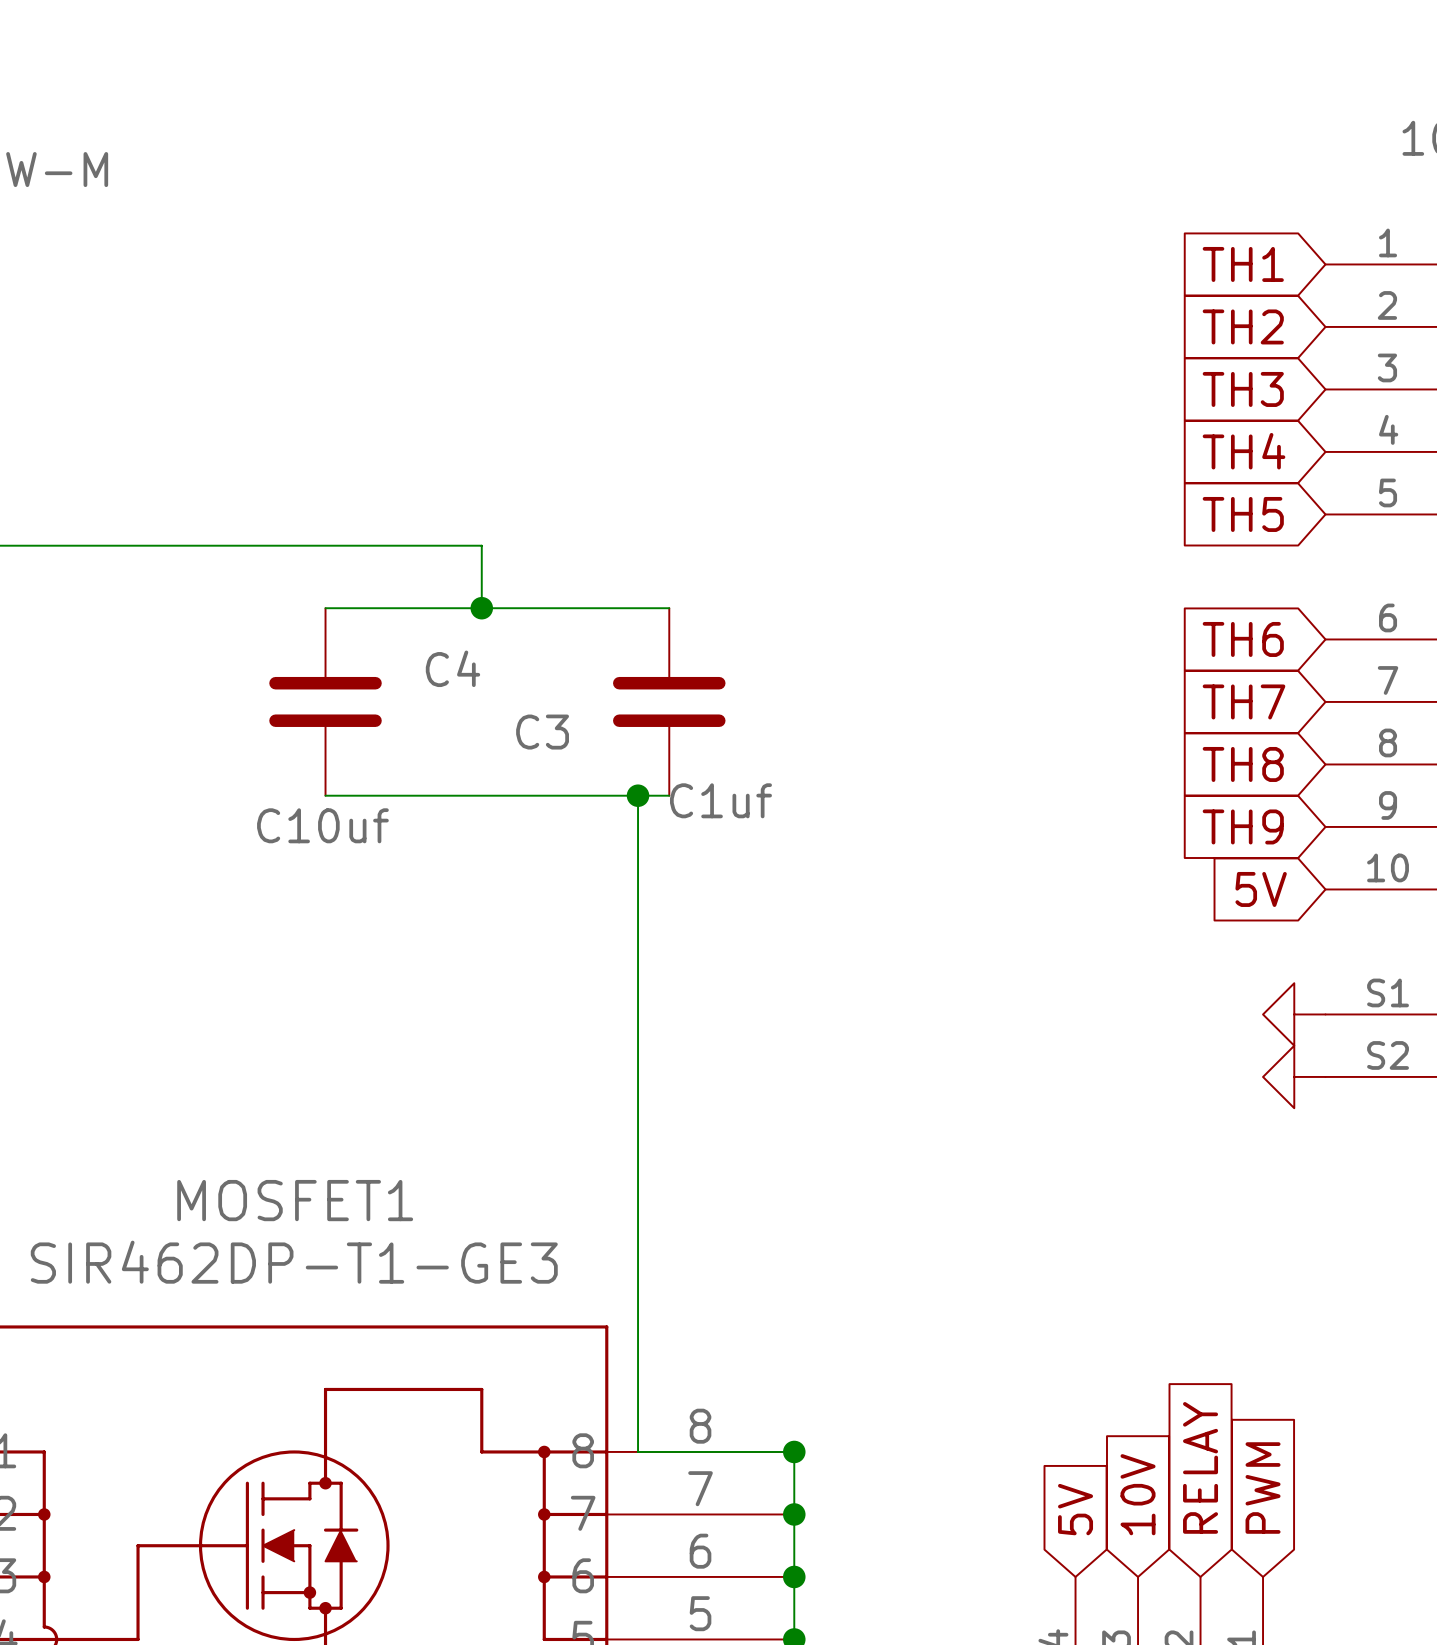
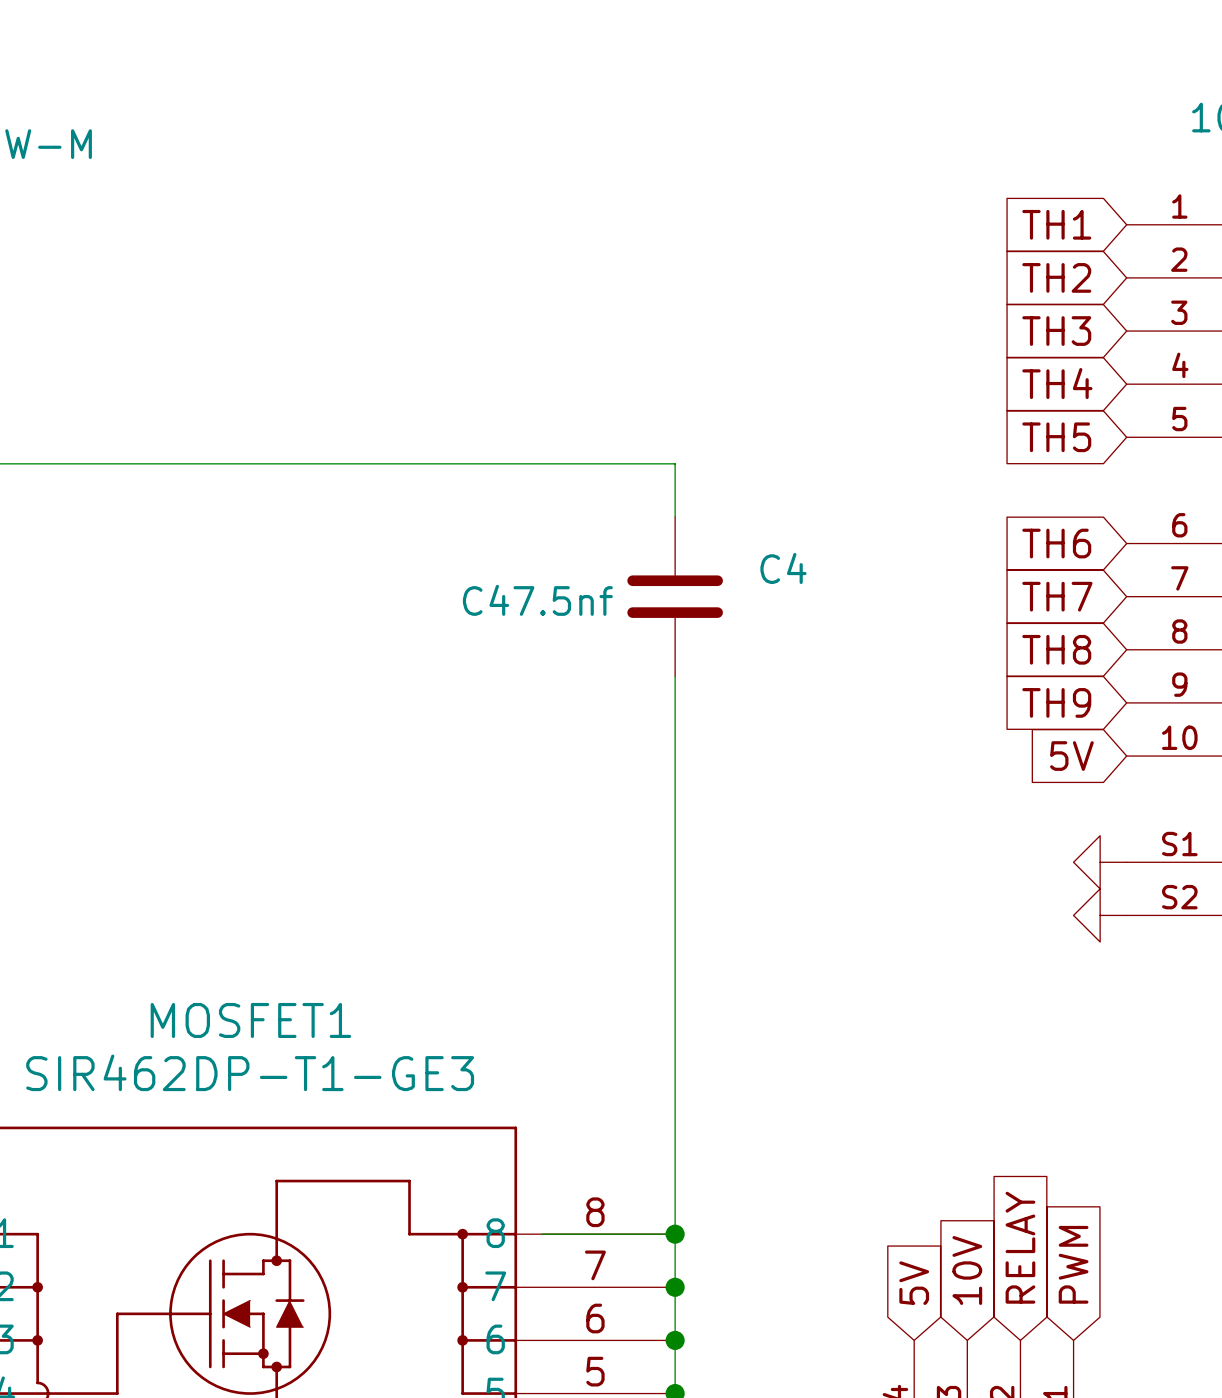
wire: (481, 545) (481, 608) -> (409, 463) (675, 463) (675, 516)
wire: (325, 608) (669, 608) -> none
junction: (481, 608) -> none
C4 position: (325, 701) -> (675, 596)
C3: C1uf (669, 701) -> none
wire: (325, 795) (669, 795) -> none
wire: (638, 795) (638, 1451) -> (675, 676) (675, 1234)
junction: (638, 795) -> none
C4 value: C10uf (322, 825) -> C47.5nf (537, 600)

